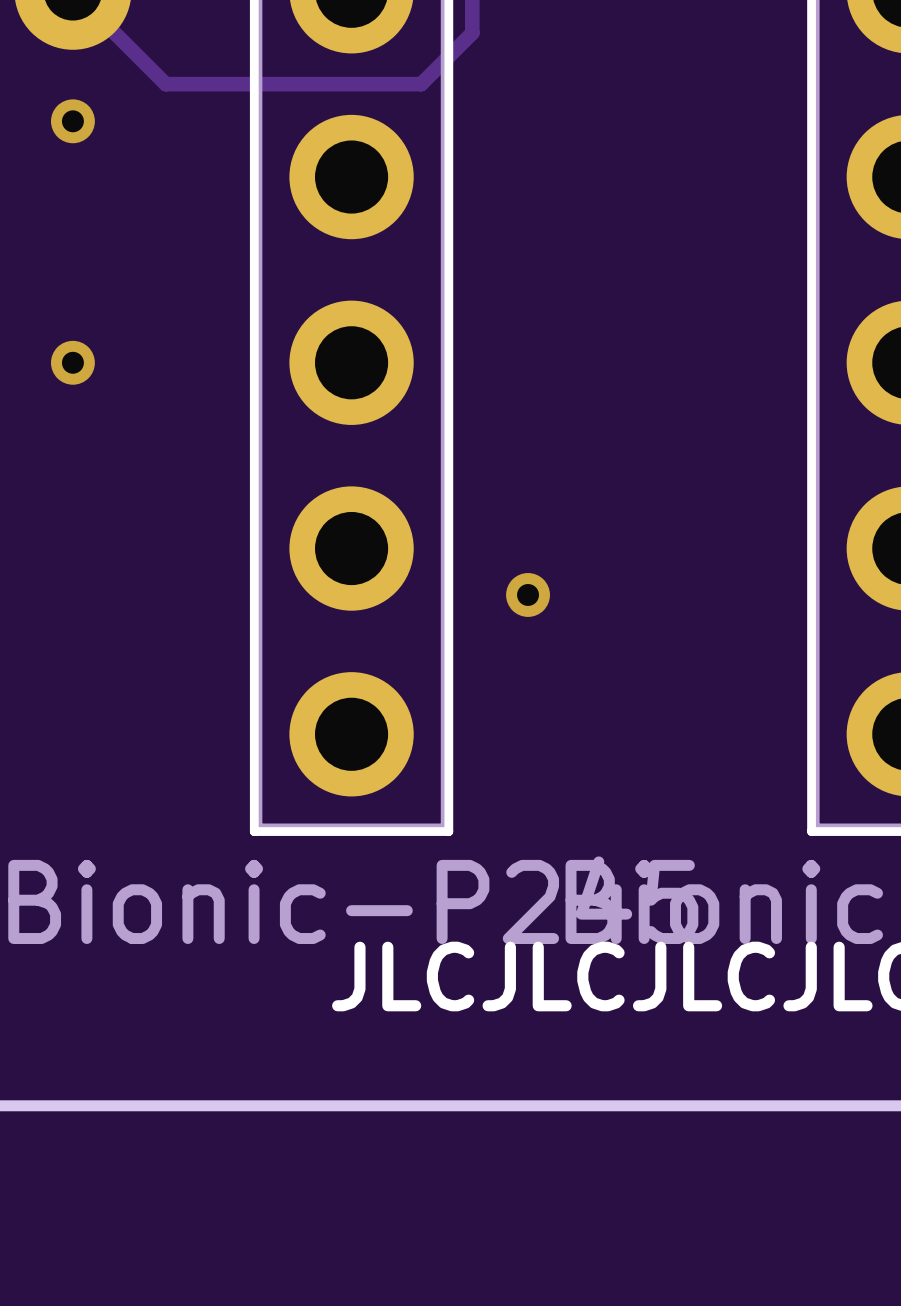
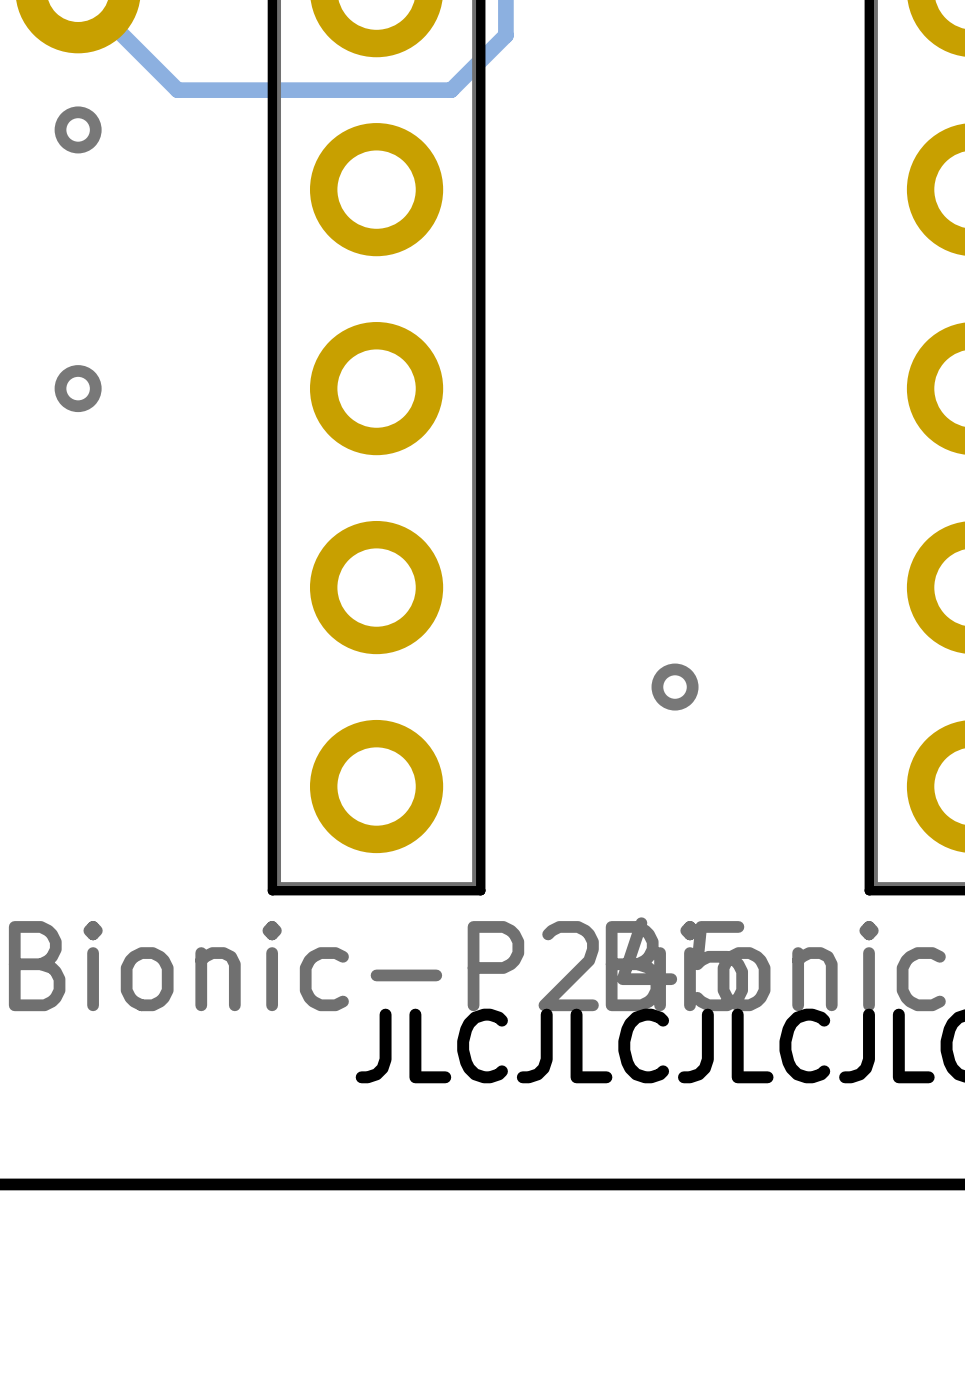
via position: (528, 594) -> (675, 687)

